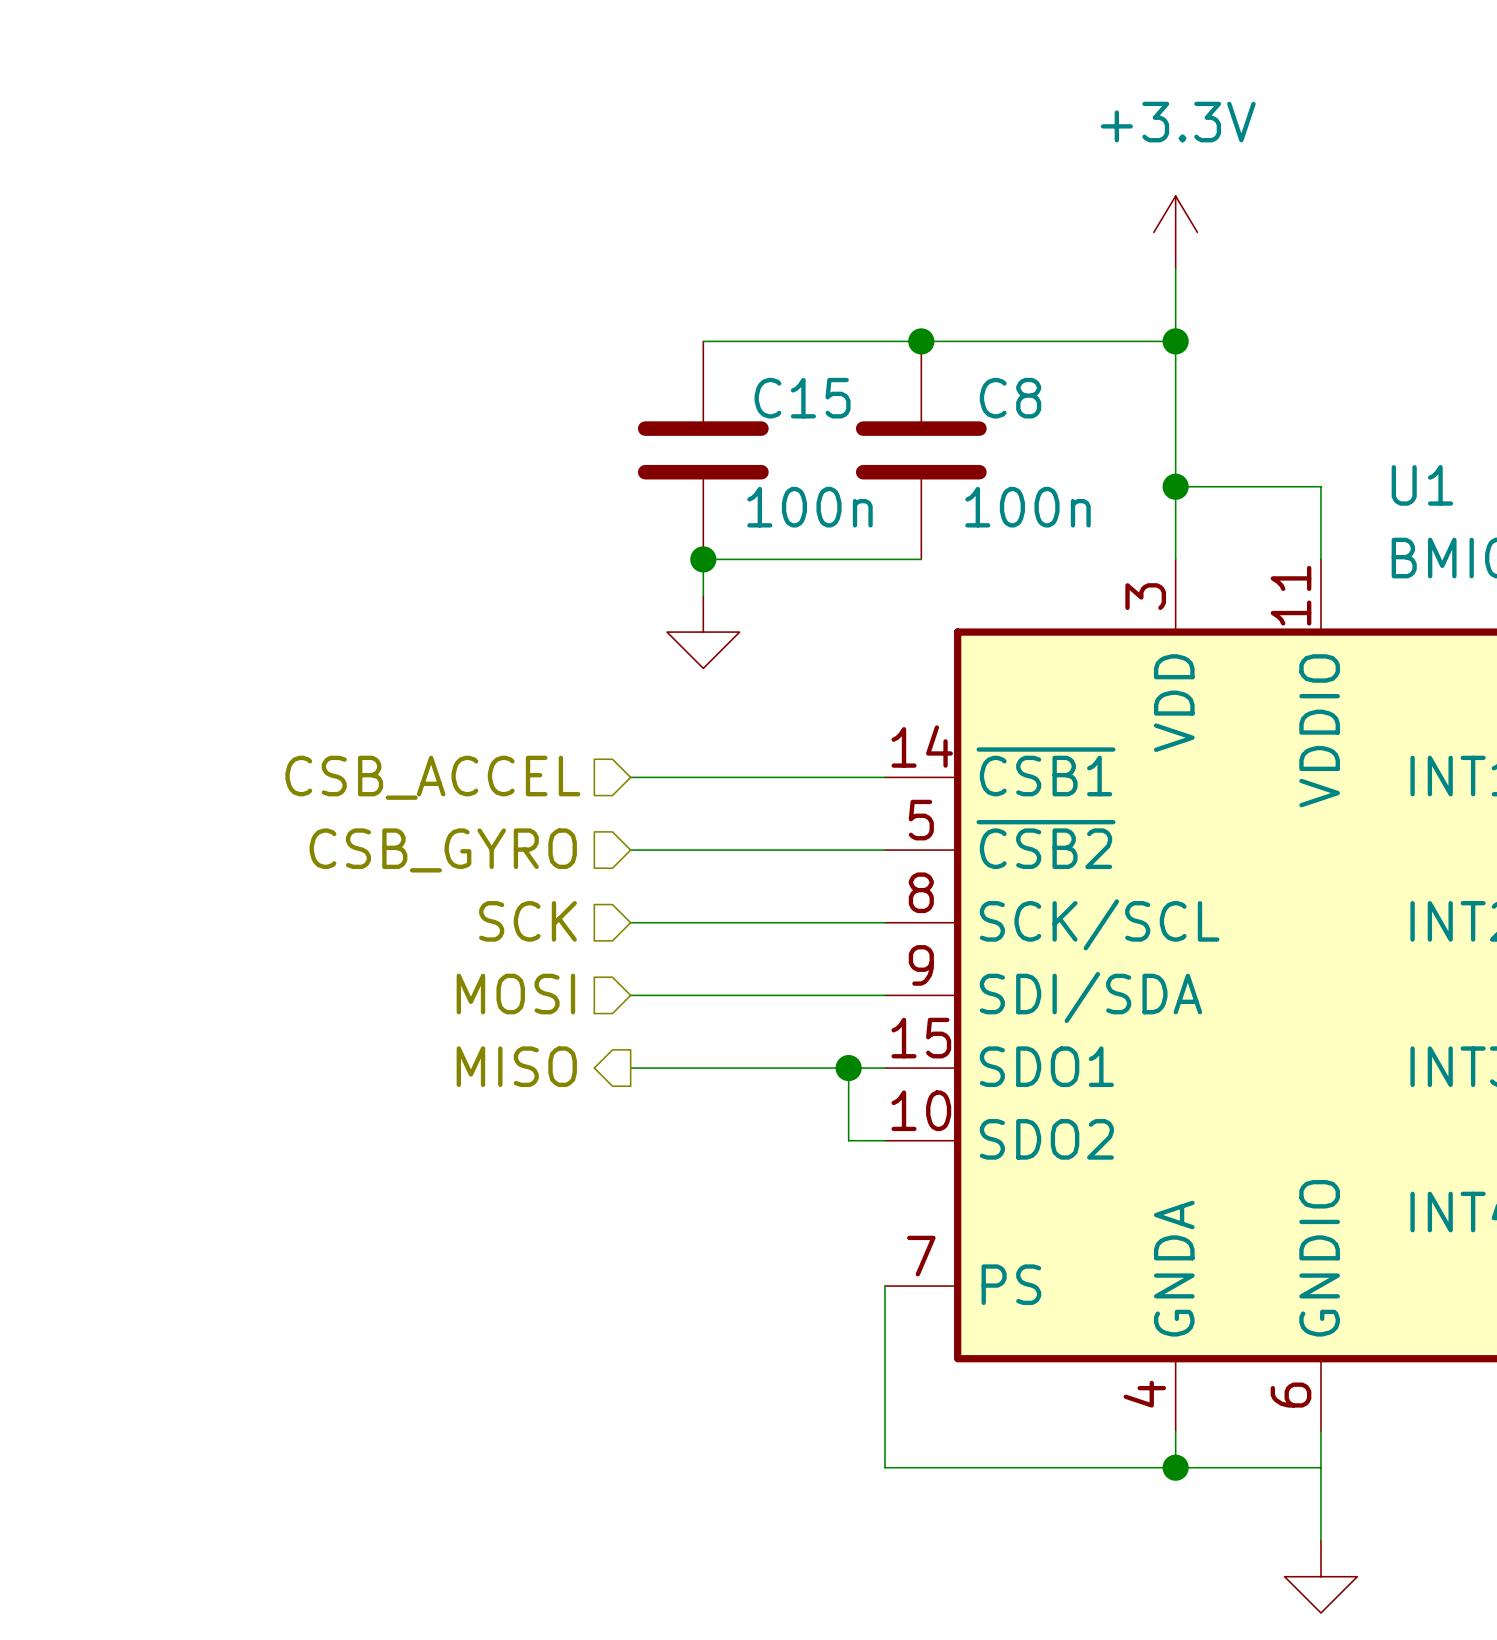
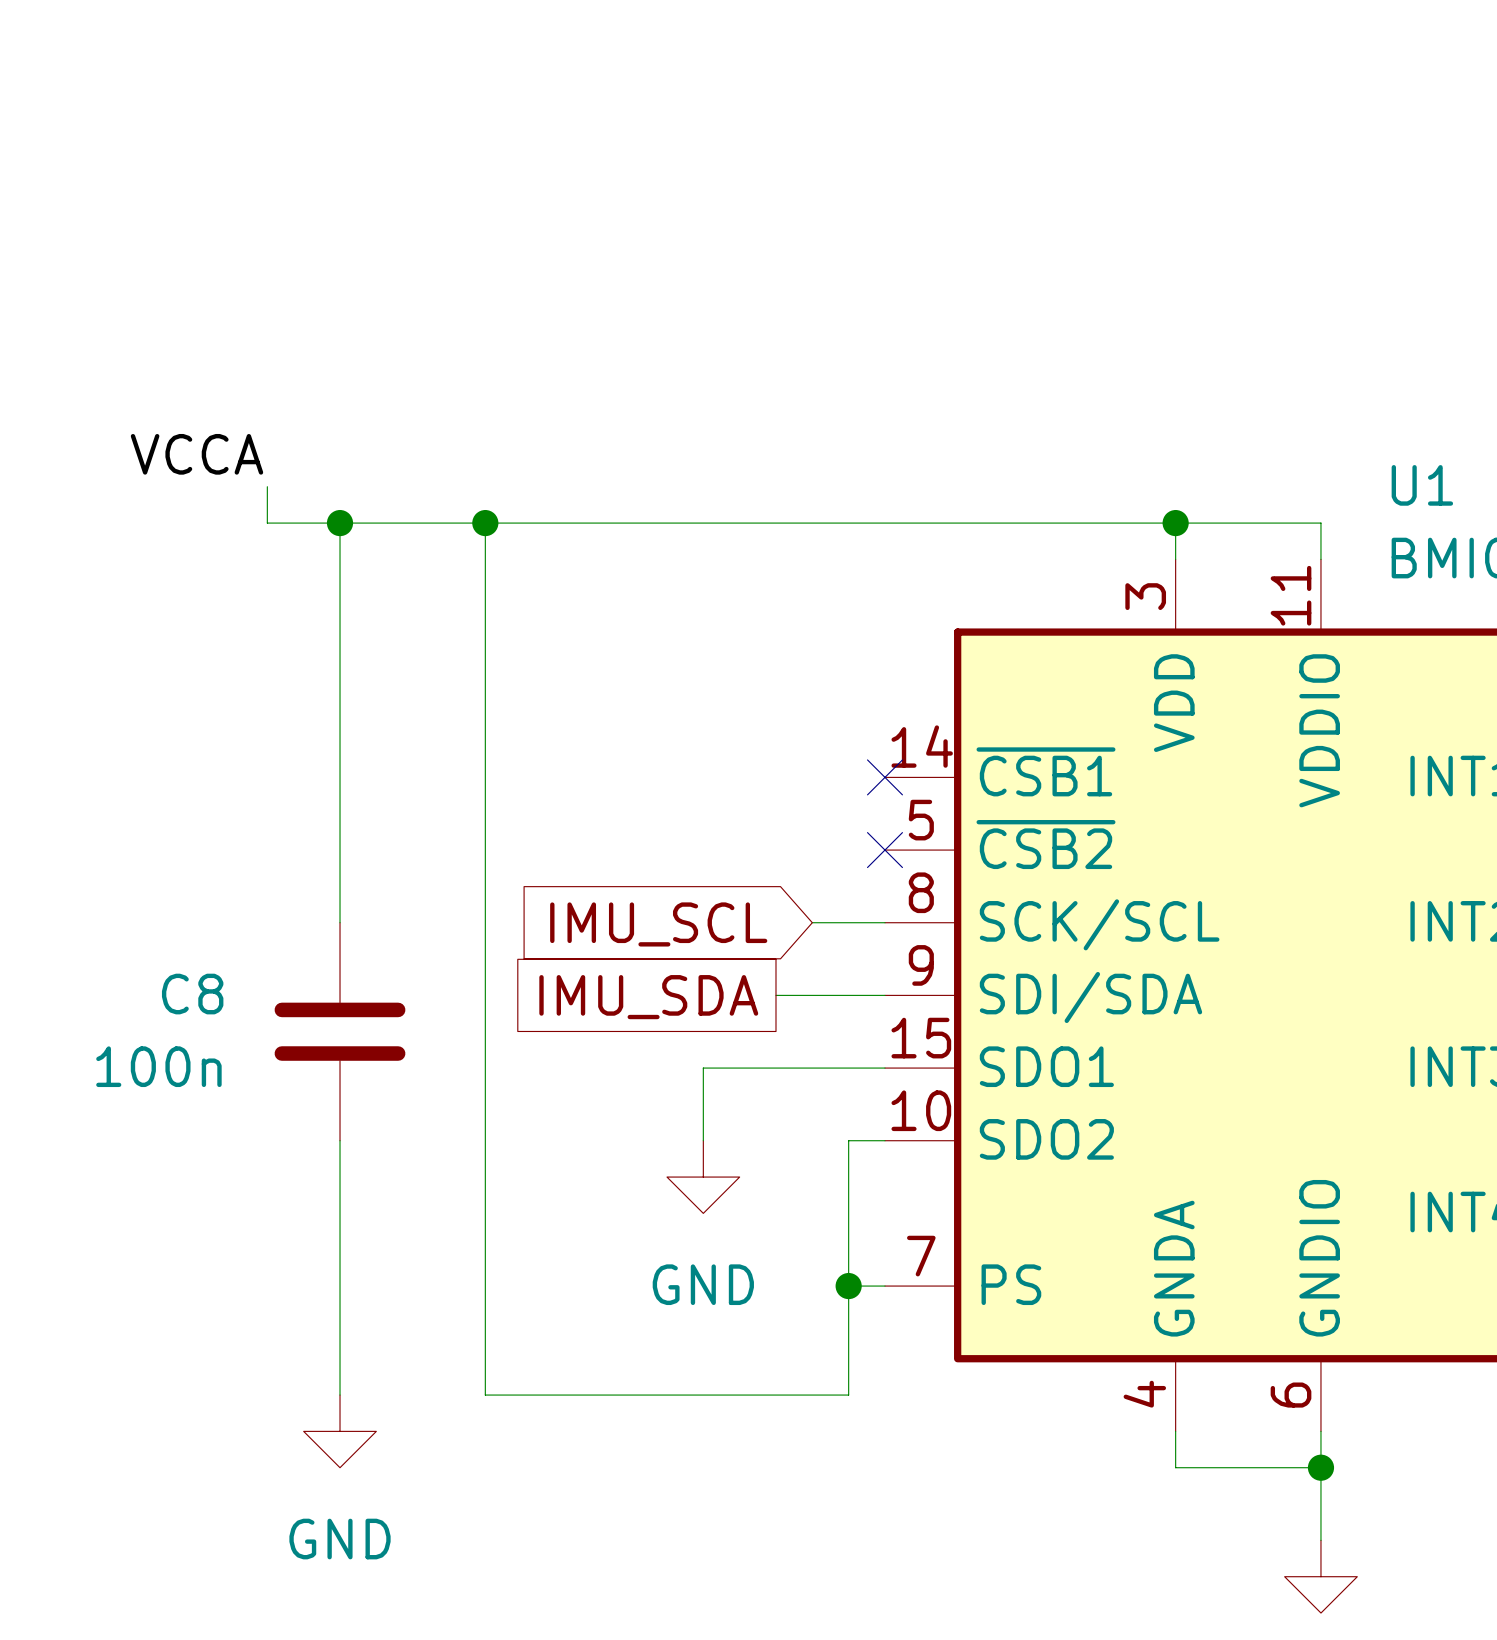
power symbol: +3.3V (1175, 232) -> none
wire: (1175, 268) (1175, 523) -> none
wire: (703, 341) (1175, 341) -> none
junction: (921, 341) -> none
junction: (1175, 341) -> none
C8 name position: C8 (1010, 398) -> C8 (192, 994)
C15: 100n (703, 450) -> none
C8 position: (921, 450) -> (340, 1031)
label: none -> VCCA (196, 454)
wire: (1175, 486) (1320, 486) (1320, 523) -> (267, 486) (267, 523) (1320, 523)
junction position: (1175, 486) -> (1175, 523)
C8 value position: 100n (1028, 507) -> 100n (158, 1066)
wire: none -> (340, 523) (340, 922)
junction: none -> (340, 523)
junction: none -> (485, 523)
junction: (703, 559) -> none
wire: (921, 559) (703, 559) (703, 595) -> none
power symbol: (703, 632) -> none
hierarchical label: CSB_ACCEL (432, 777) -> none
wire: (630, 777) (884, 777) -> none
no-connect mark: none -> (884, 777)
hierarchical label: CSB_GYRO (443, 850) -> none
wire: (630, 850) (884, 850) -> none
no-connect mark: none -> (884, 850)
hierarchical label: SCK (528, 921) -> none
wire: (630, 922) (812, 922) -> none
global label: none -> IMU_SCL (658, 924)
hierarchical label: MOSI (515, 994) -> none
wire: (630, 995) (775, 995) -> none
global label: none -> IMU_SDA (648, 997)
hierarchical label: MISO (516, 1066) -> none
wire: (630, 1068) (703, 1068) -> (703, 1140) (703, 1068)
wire: (848, 1068) (848, 1140) -> (485, 523) (485, 1395) (848, 1395) (848, 1140)
junction: (848, 1068) -> none
wire: none -> (340, 1140) (340, 1395)
power symbol: none -> GND (703, 1177)
junction: none -> (848, 1286)
wire: (884, 1286) (884, 1467) (1175, 1467) -> (884, 1286) (848, 1286)
power symbol: none -> GND (340, 1431)
junction position: (1175, 1467) -> (1320, 1467)

